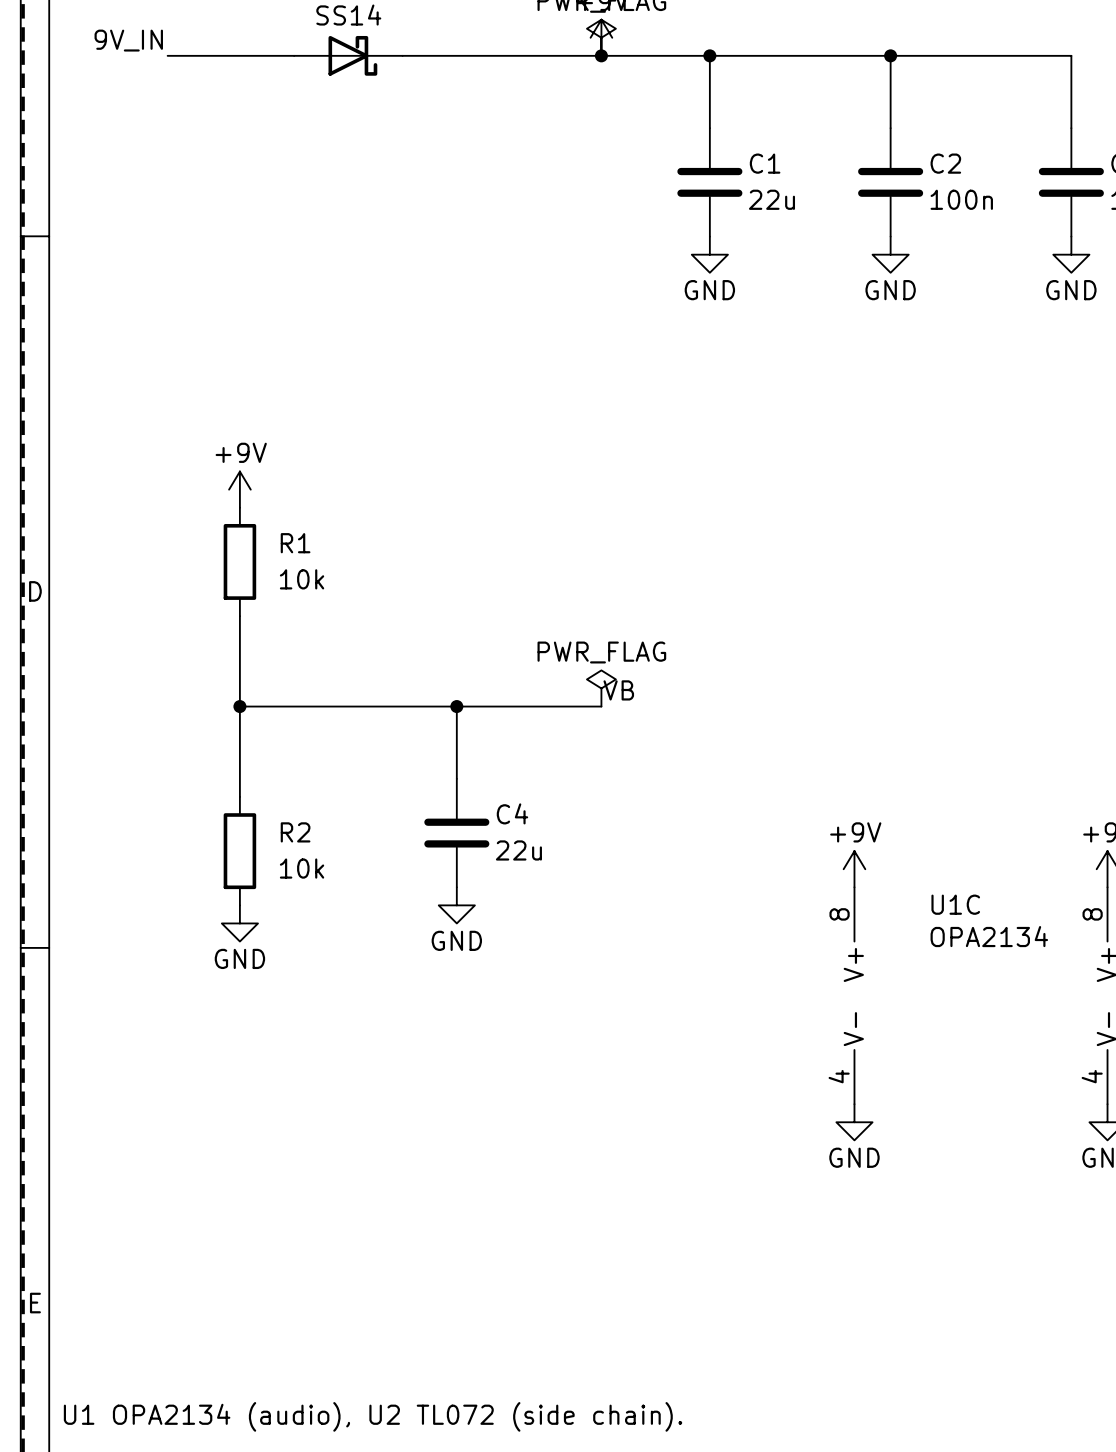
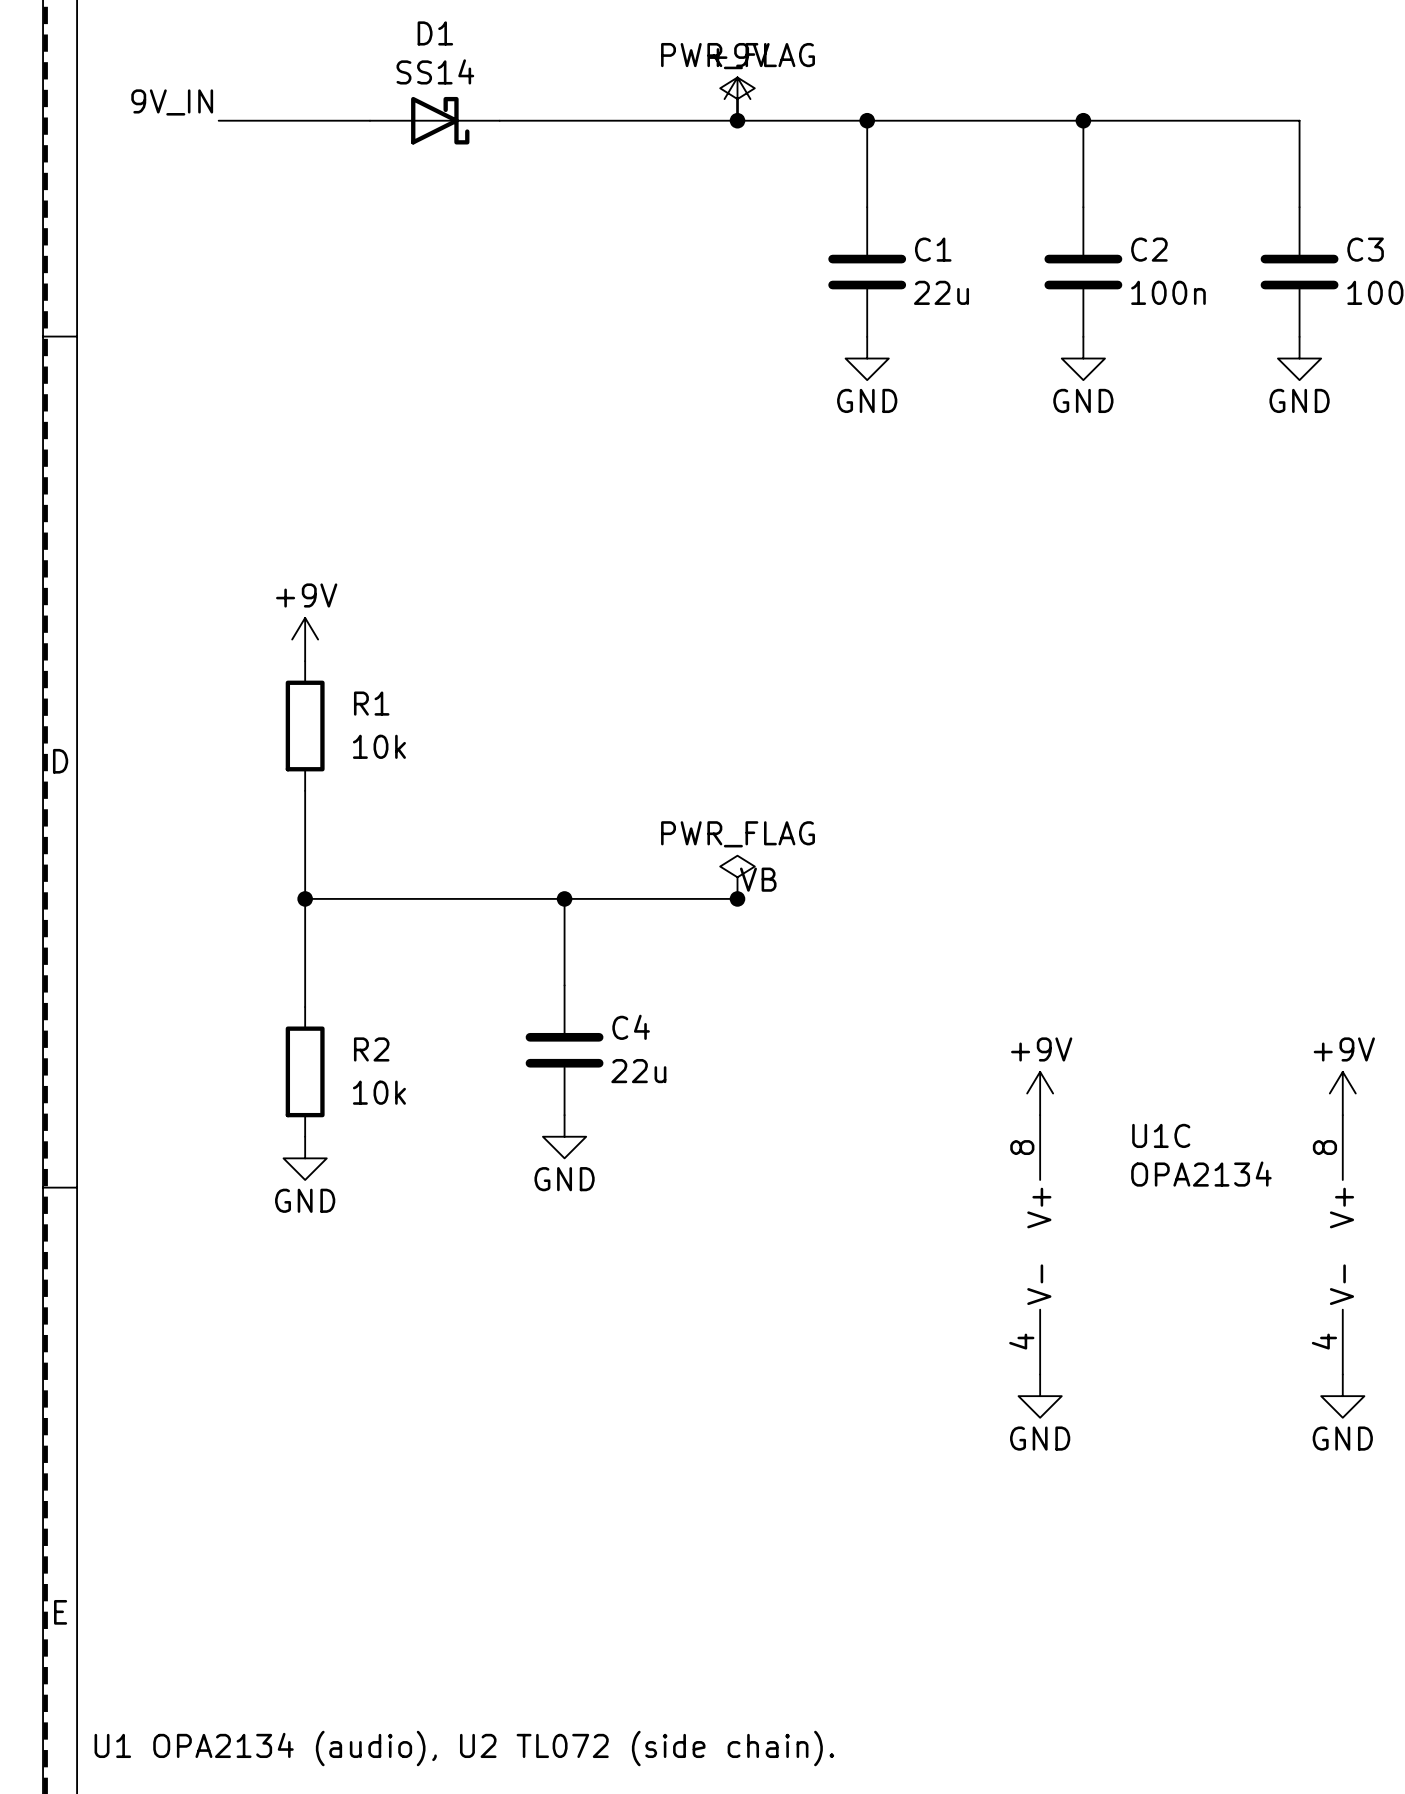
junction: none -> (737, 898)

